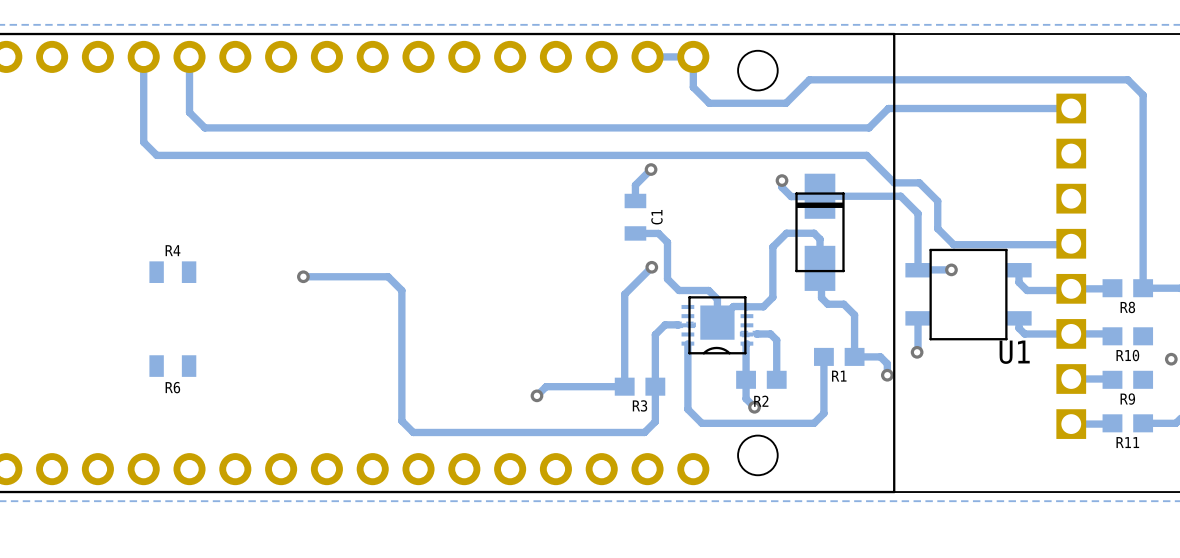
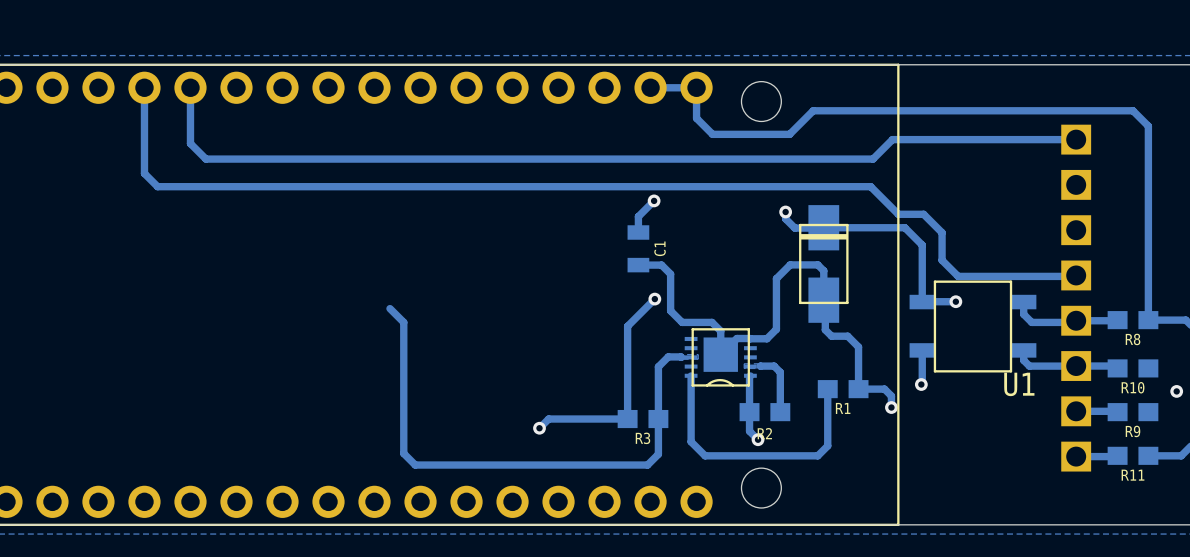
R4: (172, 272) -> none
via: (303, 276) -> none
track: (388, 276) (303, 276) -> none
R6: (172, 366) -> none

